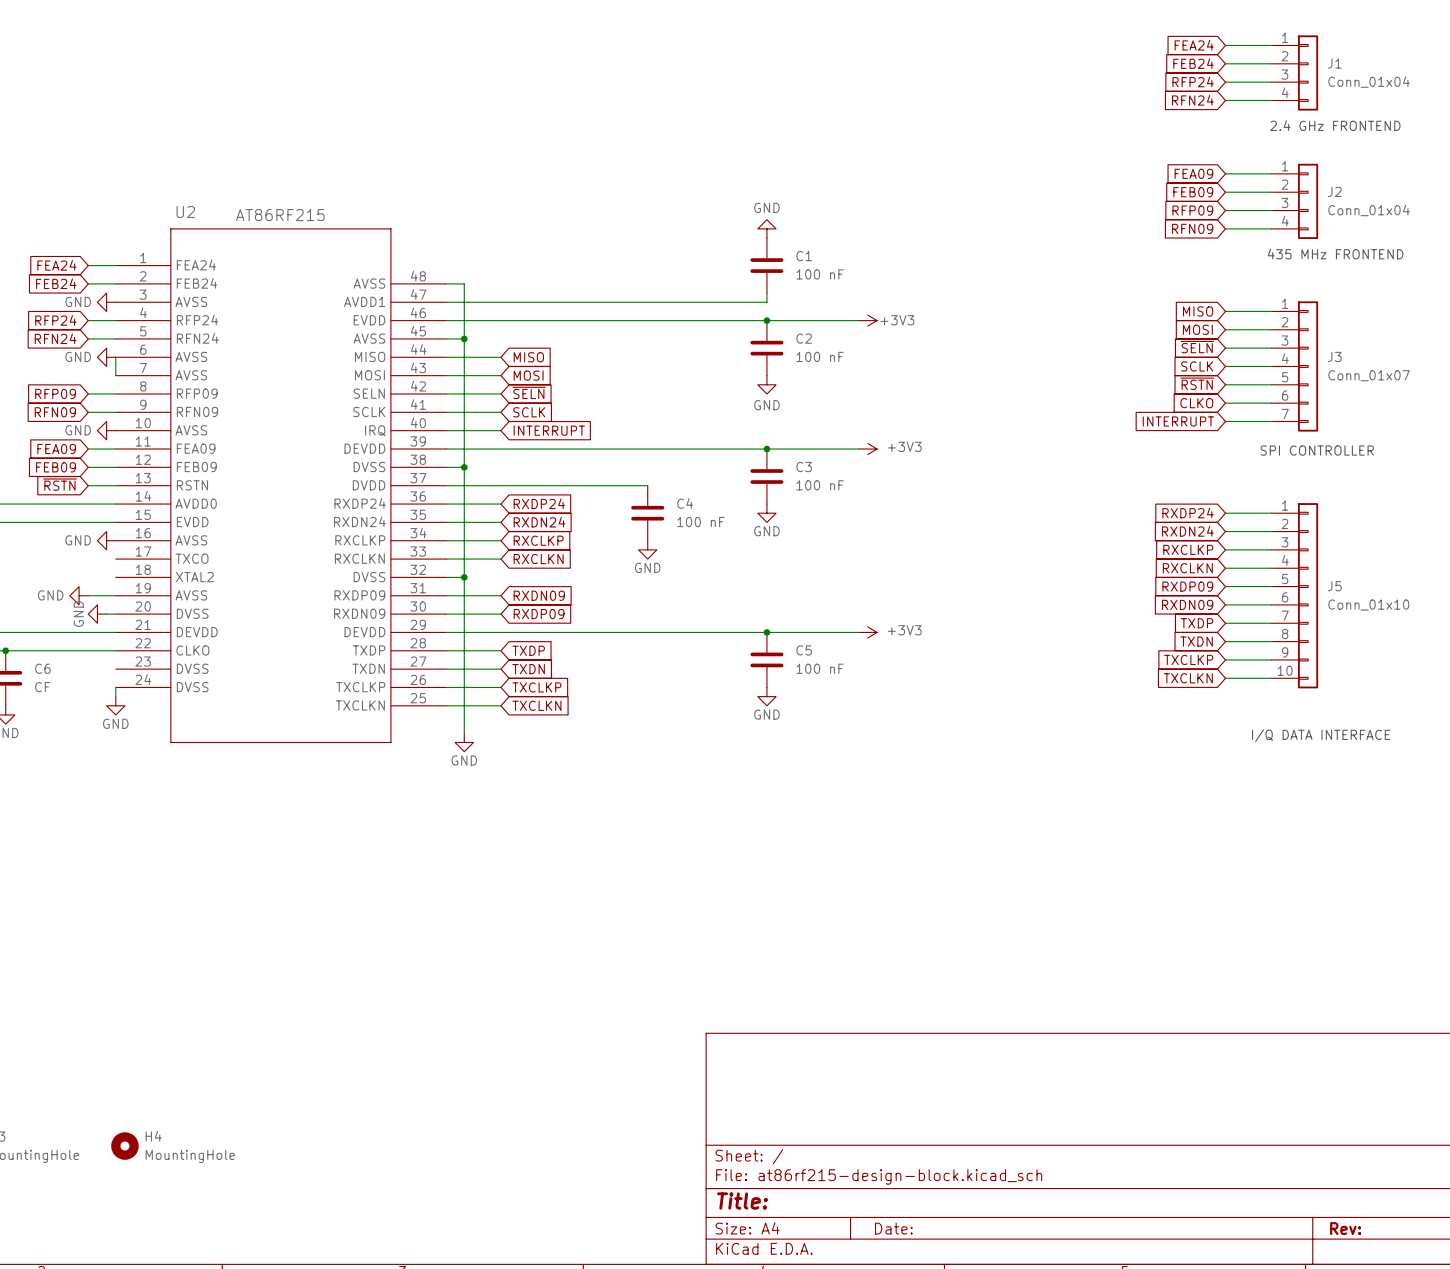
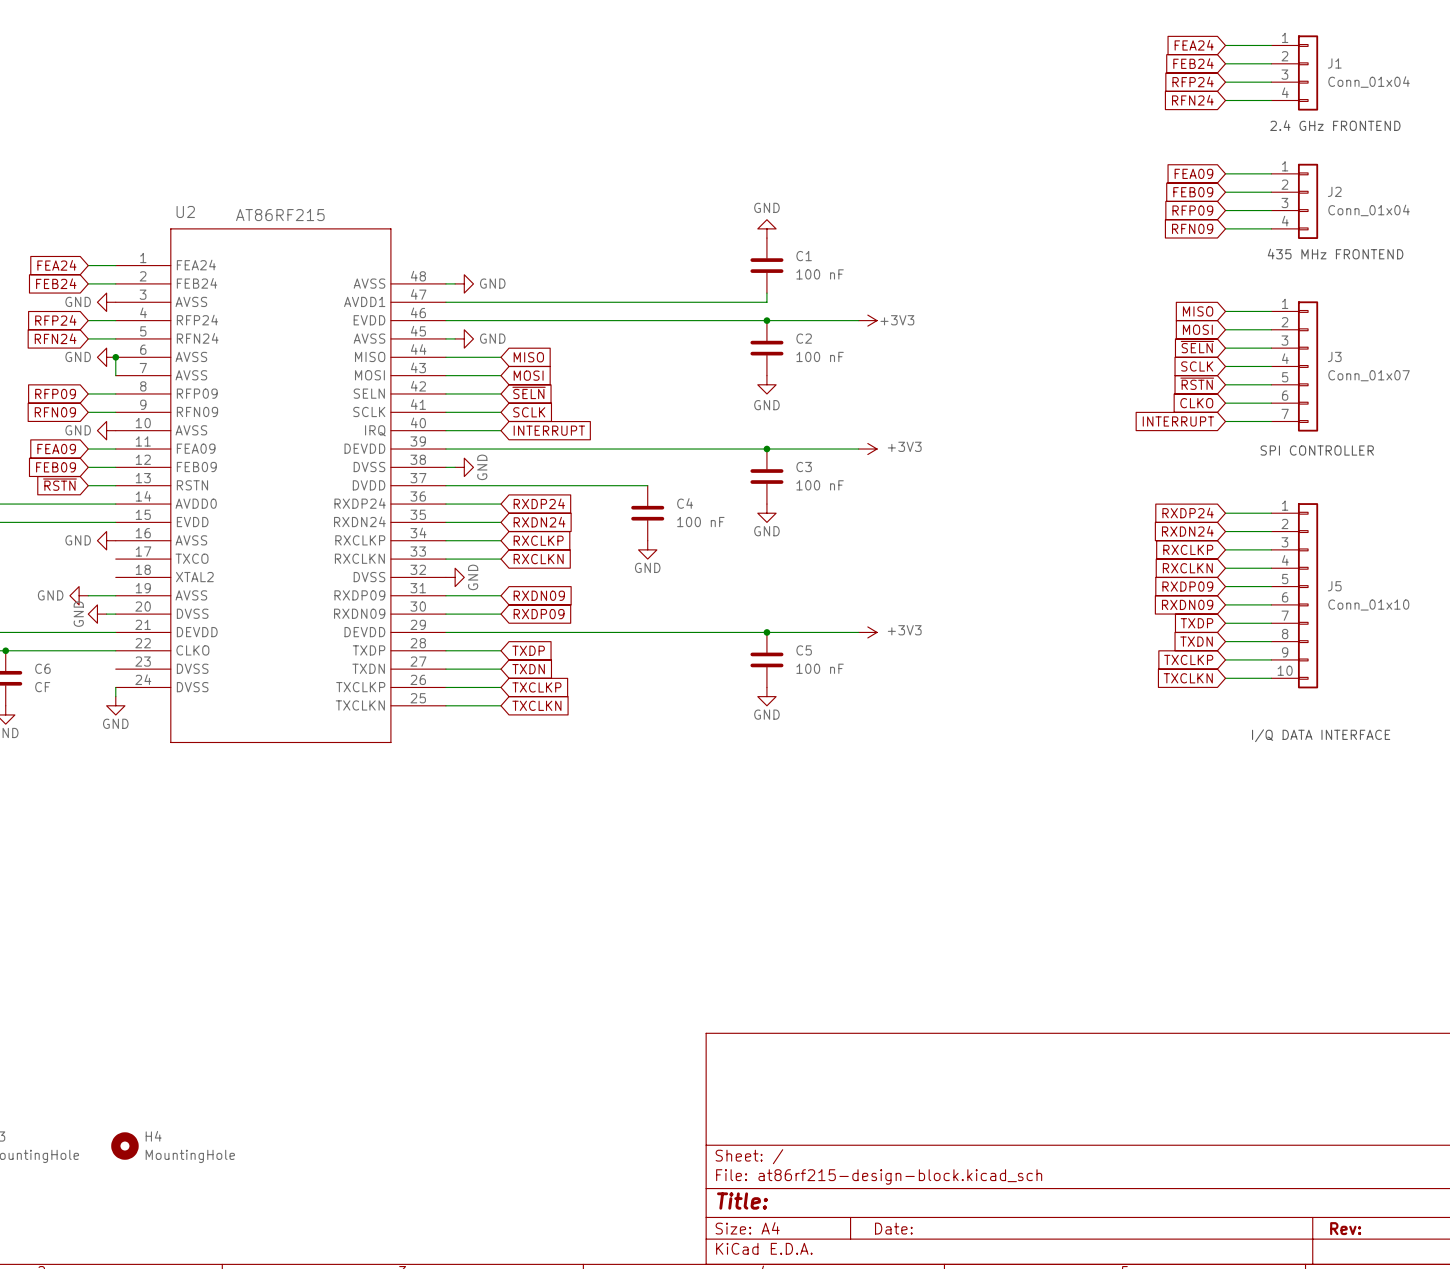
wire: (455, 283) (464, 283) (464, 733) -> none
power symbol: none -> GND (464, 283)
junction: (464, 338) -> none
power symbol: none -> GND (464, 338)
junction: none -> (115, 357)
junction: (464, 467) -> none
power symbol: none -> GND (464, 467)
power symbol: none -> GND (455, 577)
junction: (464, 577) -> none
power symbol: GND (464, 742) -> none

